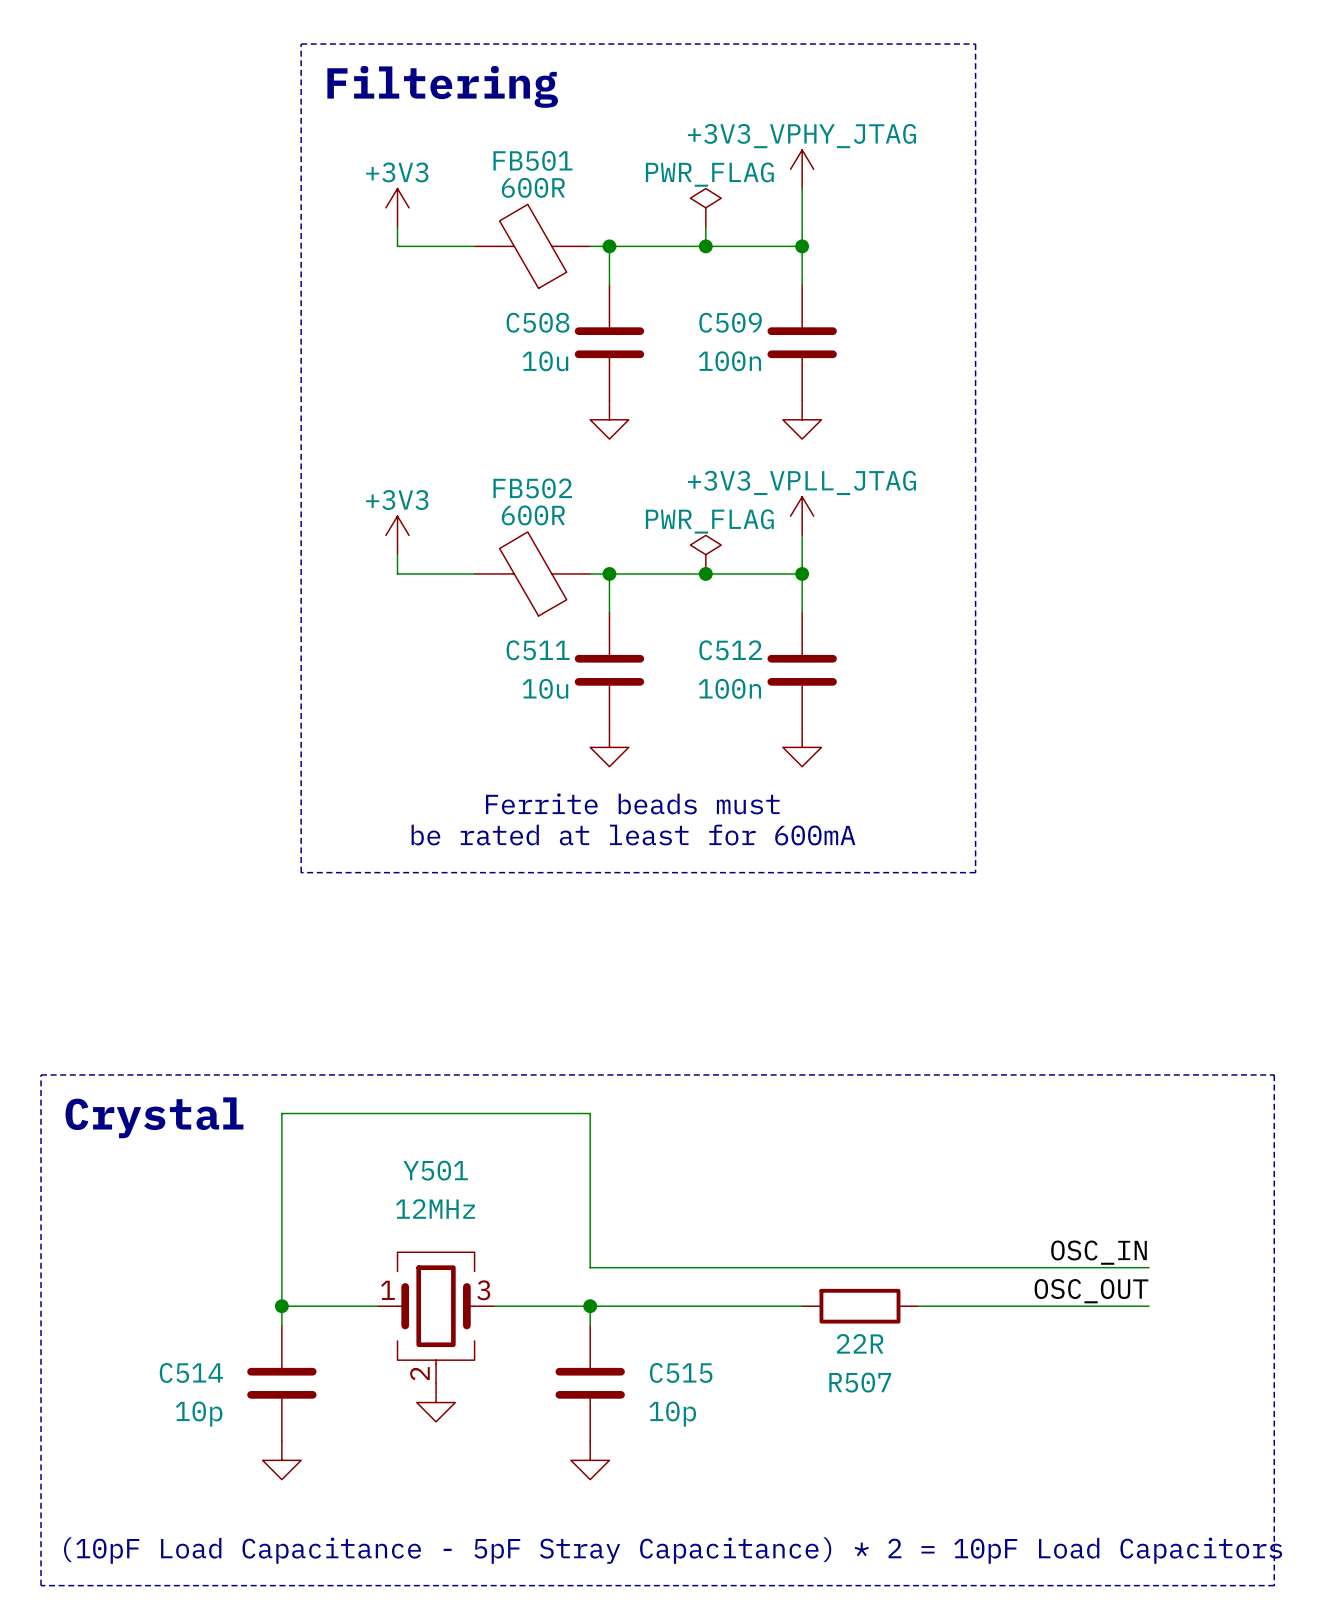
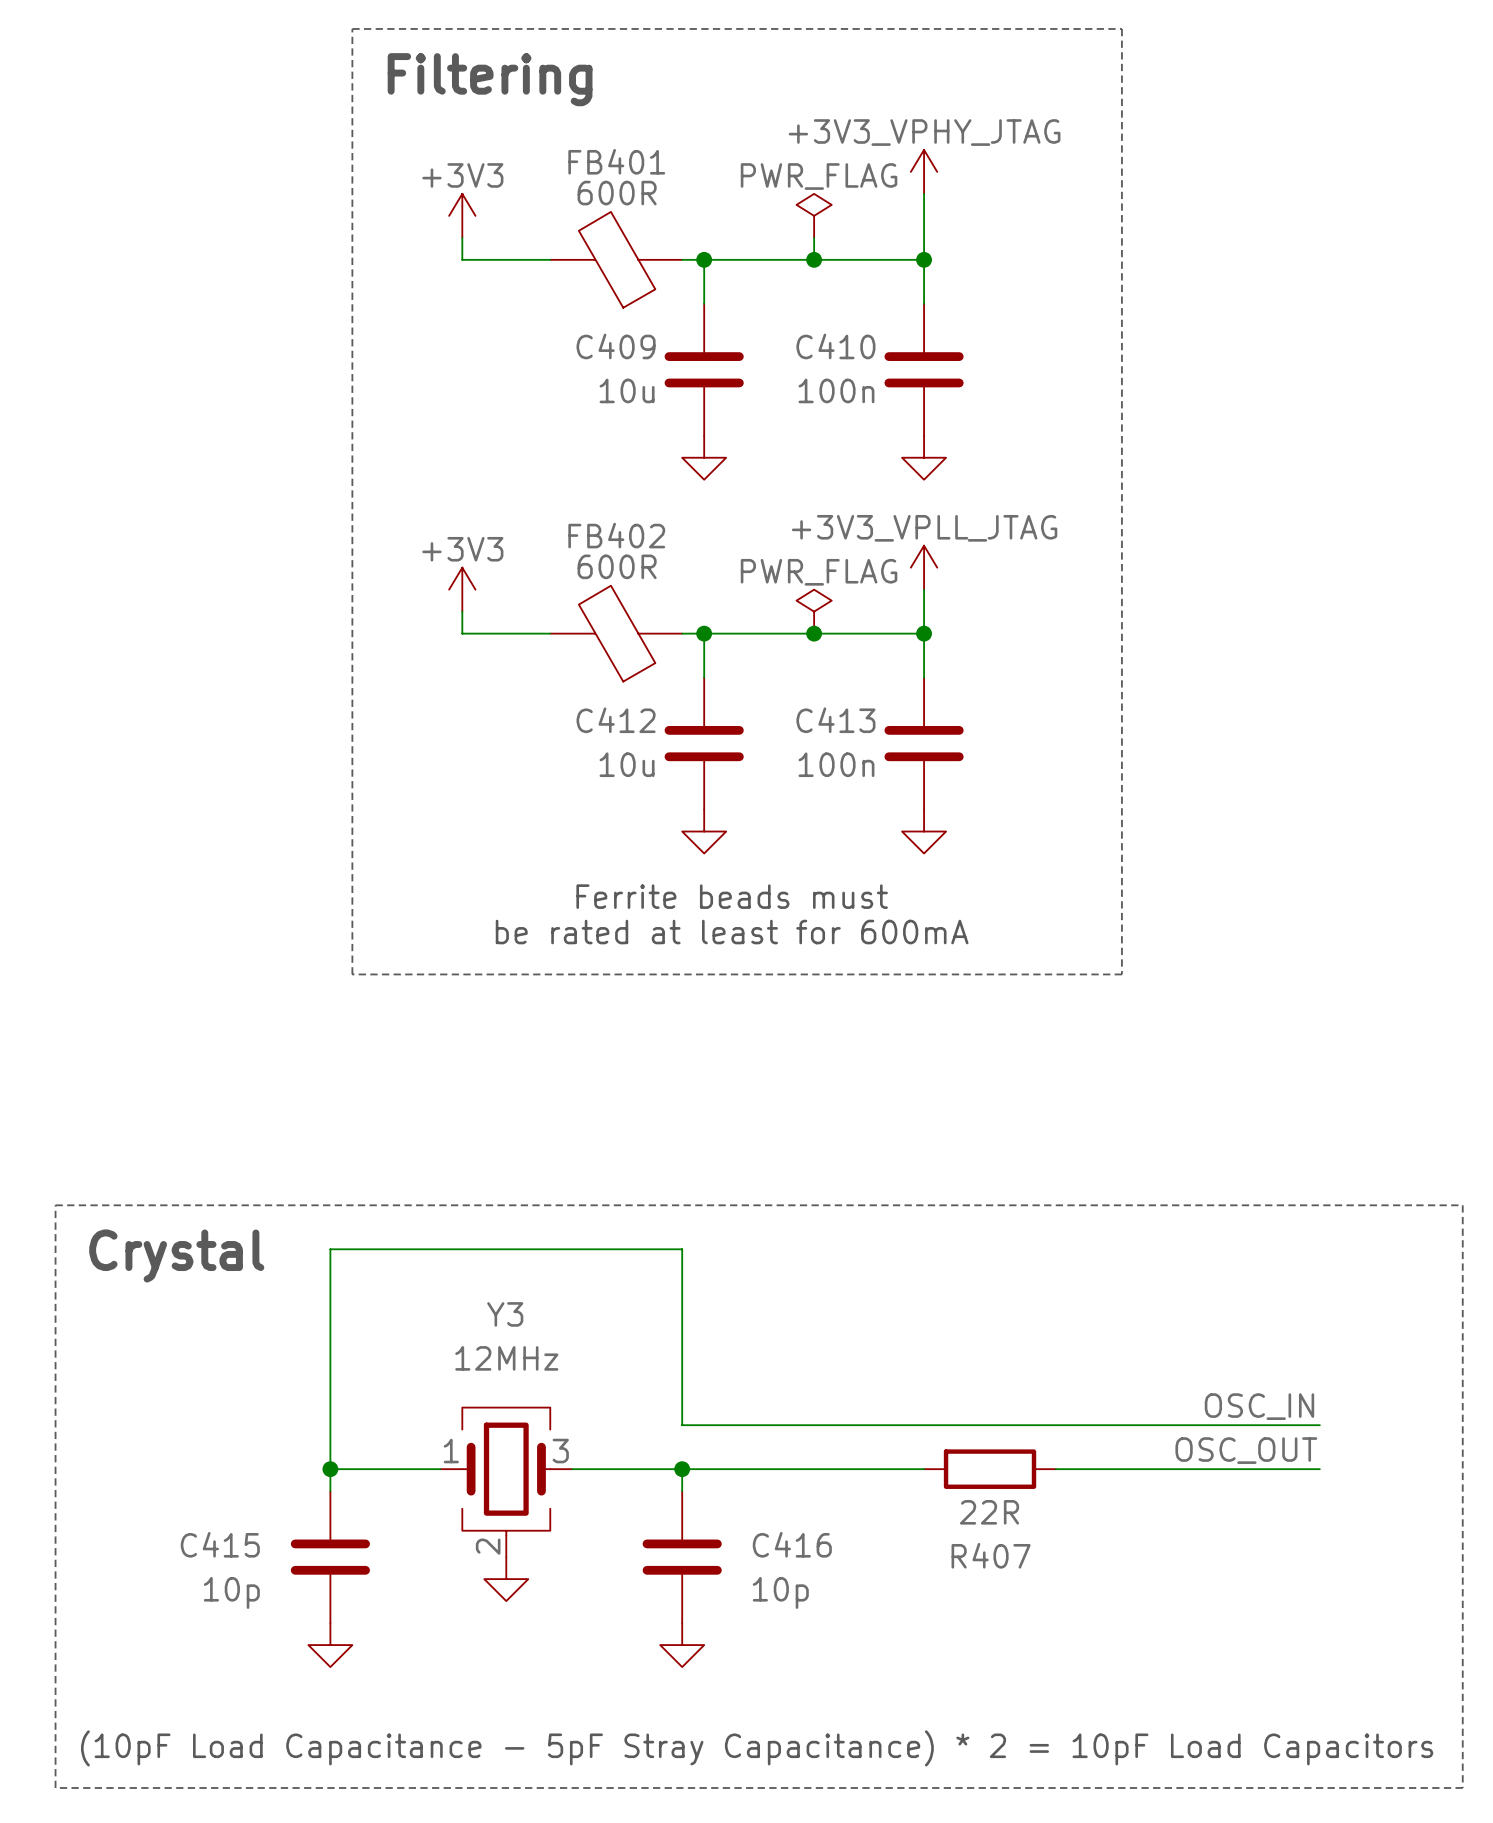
FB501 name: FB501 (532, 160) -> FB401 (616, 161)
C508 name: C508 (538, 322) -> C409 (616, 346)
C509 name: C509 (730, 322) -> C410 (835, 346)
FB502 name: FB502 (532, 488) -> FB402 (616, 535)
C511 name: C511 (538, 650) -> C412 (616, 720)
C512 name: C512 (730, 650) -> C413 (835, 720)
Y501 name: Y501 (435, 1170) -> Y3 (505, 1314)
C514 name: C514 (191, 1372) -> C415 (220, 1544)
C515 name: C515 (681, 1372) -> C416 (792, 1544)
R507 name: R507 (860, 1382) -> R407 (991, 1555)

